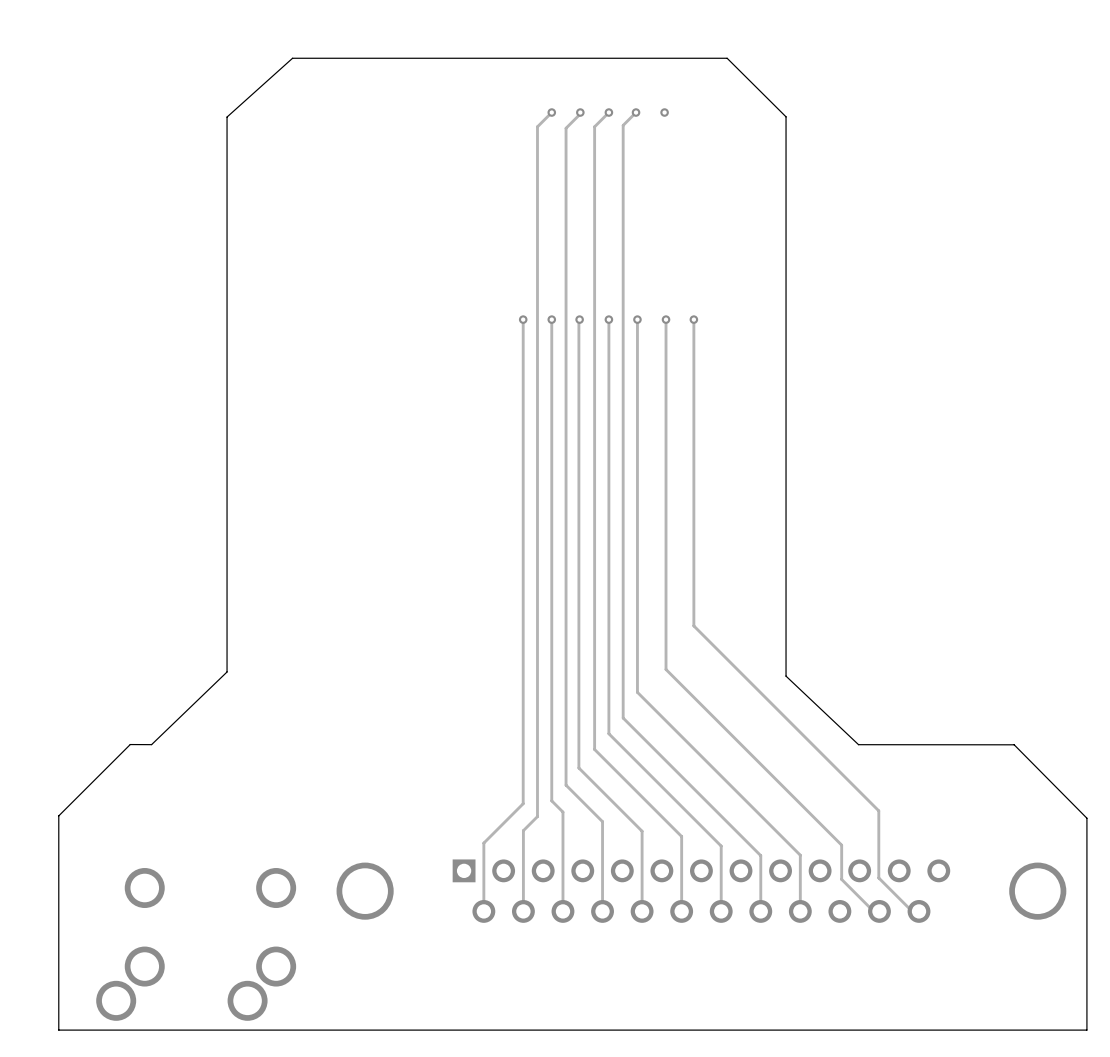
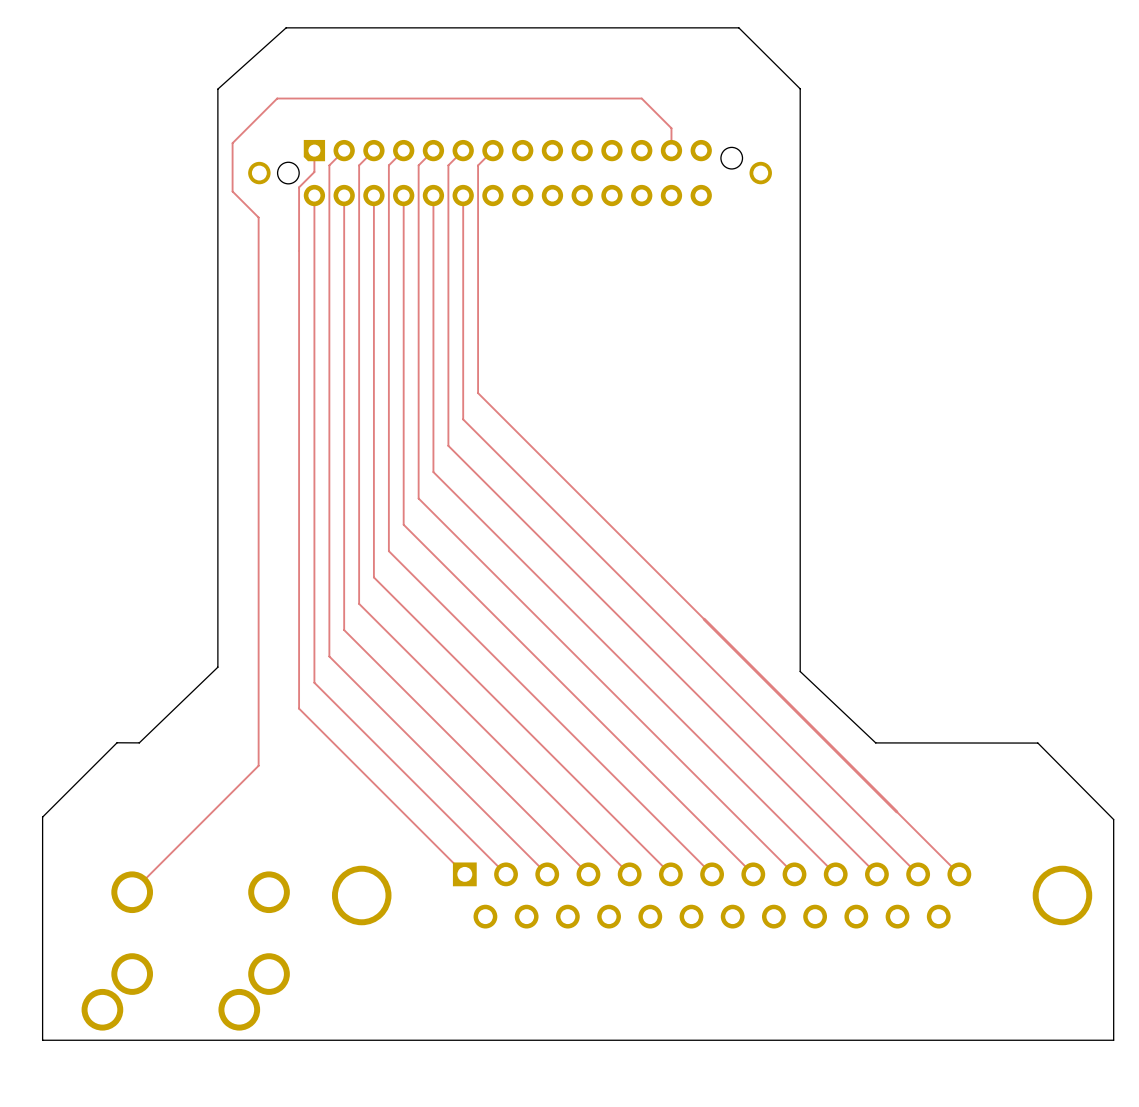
track: (551, 112) (537, 126) (537, 816) (523, 830) (523, 911) -> none
via: (551, 112) -> none
track: (580, 112) (566, 128) (566, 785) (602, 821) (602, 911) -> none
via: (580, 112) -> none
track: (608, 112) (594, 126) (594, 749) (681, 836) (681, 911) -> none
via: (608, 112) -> none
track: (636, 112) (623, 125) (623, 718) (760, 855) (760, 911) -> none
via: (636, 112) -> none
via: (664, 112) -> none
track: none -> (314, 150) (314, 172) (299, 187) (299, 708) (464, 874)
track: none -> (344, 150) (329, 165) (329, 656) (547, 874)
track: none -> (373, 150) (359, 165) (359, 603) (629, 874)
track: none -> (403, 150) (388, 165) (388, 551) (712, 874)
track: none -> (433, 150) (418, 165) (418, 498) (794, 874)
track: none -> (463, 150) (448, 165) (448, 445) (876, 874)
track: none -> (671, 150) (671, 128) (641, 98) (277, 98) (232, 143) (232, 191) (258, 217) (258, 765) (132, 892)
part: none -> (510, 173)
track: none -> (314, 195) (314, 682) (506, 874)
track: none -> (344, 195) (344, 630) (588, 874)
track: none -> (373, 195) (373, 577) (670, 874)
track: none -> (403, 195) (403, 524) (753, 874)
track: none -> (433, 195) (433, 472) (835, 874)
track: none -> (463, 195) (463, 419) (918, 874)
track: (523, 319) (523, 803) (483, 843) (483, 911) -> none
via: (523, 319) -> none
track: (551, 319) (551, 800) (562, 812) (562, 911) -> none
via: (551, 319) -> none
track: (579, 319) (578, 768) (642, 831) (642, 911) -> none
via: (579, 319) -> none
track: (608, 319) (608, 733) (721, 846) (721, 911) -> none
via: (608, 319) -> none
track: (637, 319) (637, 692) (800, 855) (800, 911) -> none
via: (637, 319) -> none
track: (666, 319) (666, 669) (841, 845) (841, 879) (873, 911) -> none
via: (666, 319) -> none
track: (693, 319) (693, 625) -> (492, 150) (478, 165) (478, 393) (704, 619)
via: (693, 319) -> none
track: (878, 810) (878, 878) (912, 911) -> (896, 811) (959, 874)

